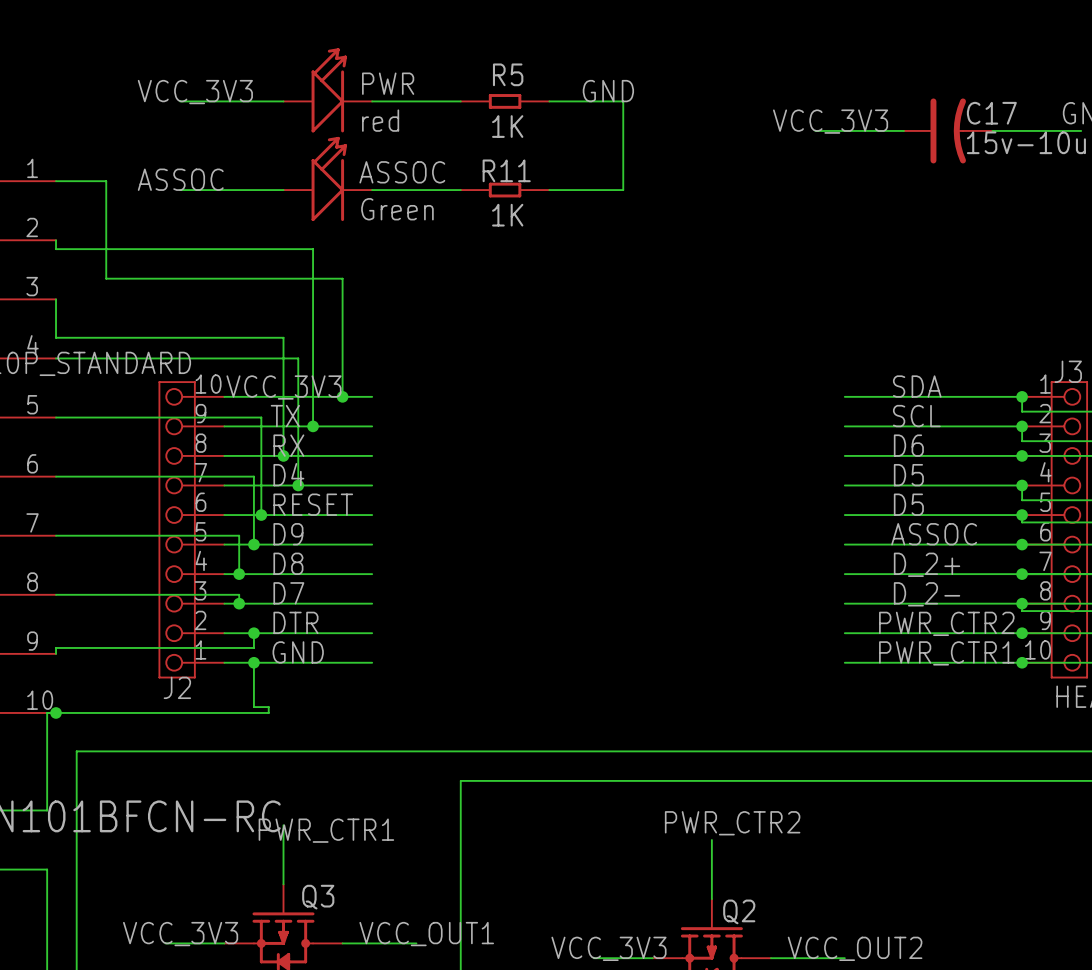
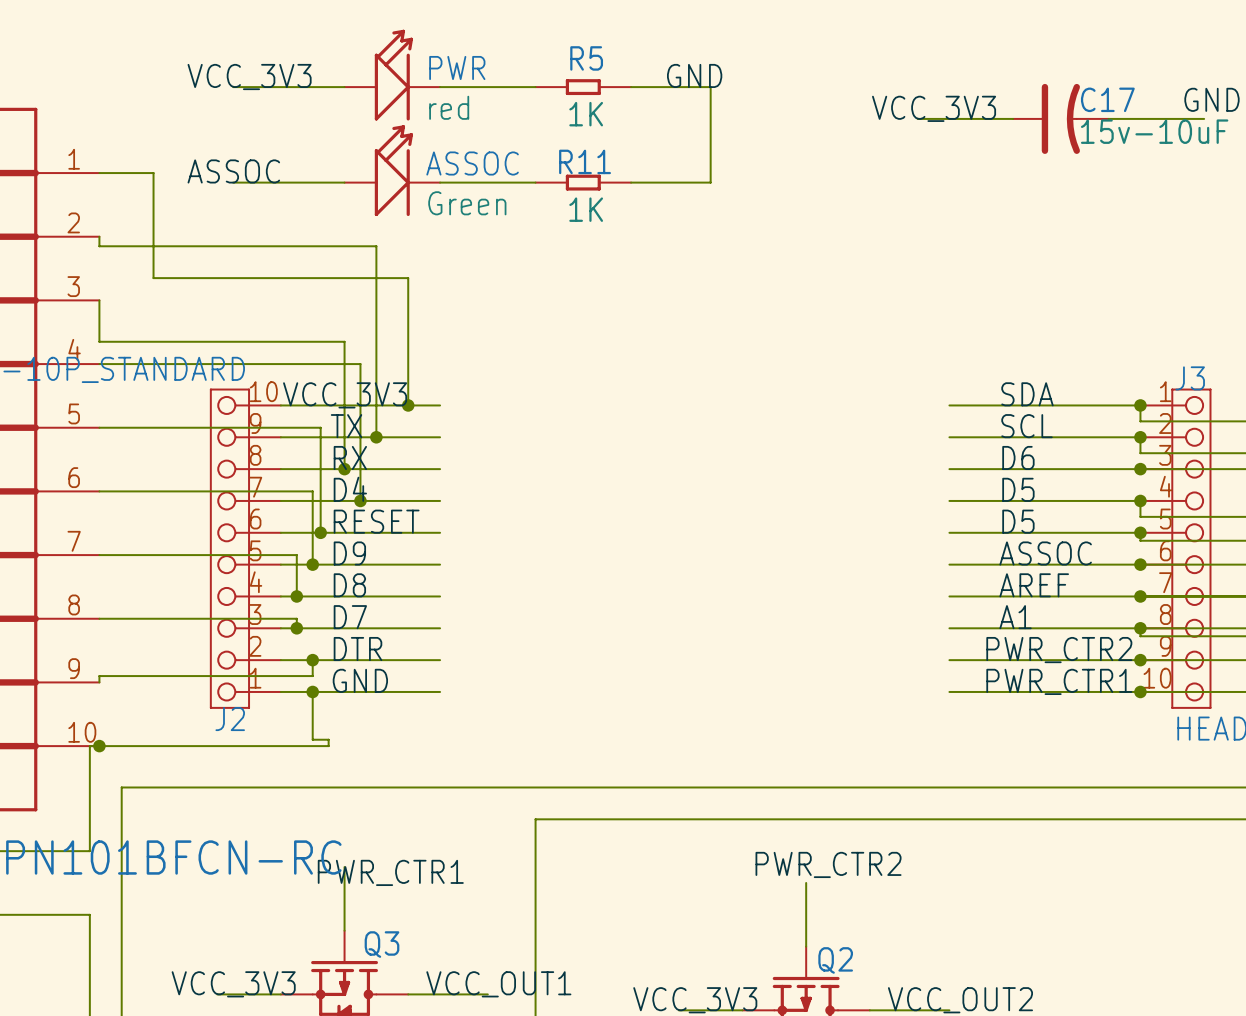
label: D_2+ (927, 564) -> AREF (1034, 585)
label: D_2- (927, 594) -> A1 (1015, 617)

